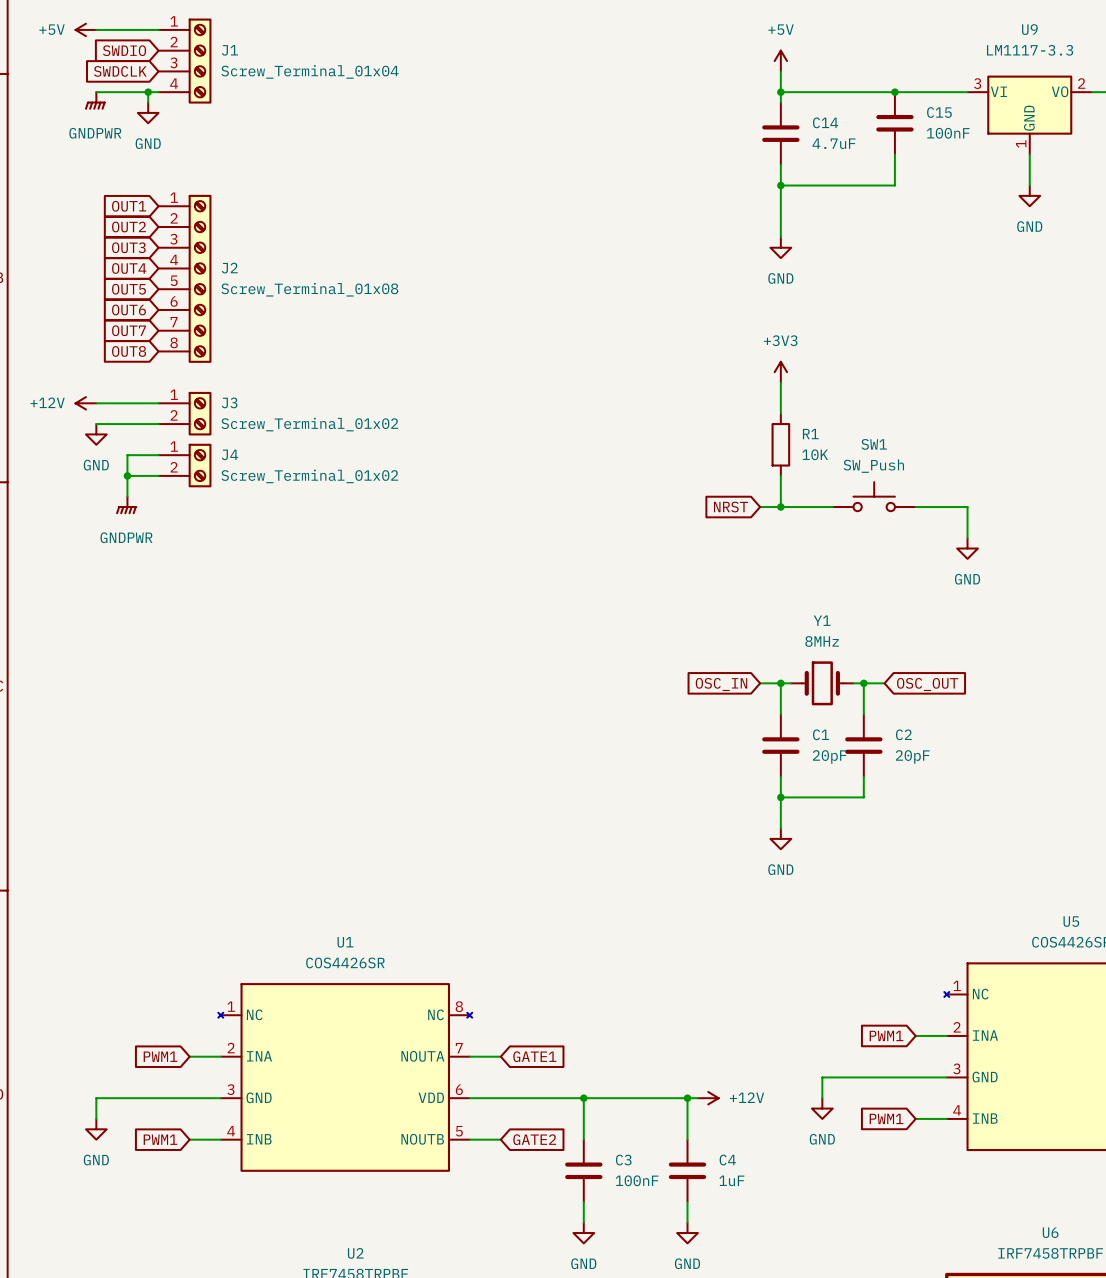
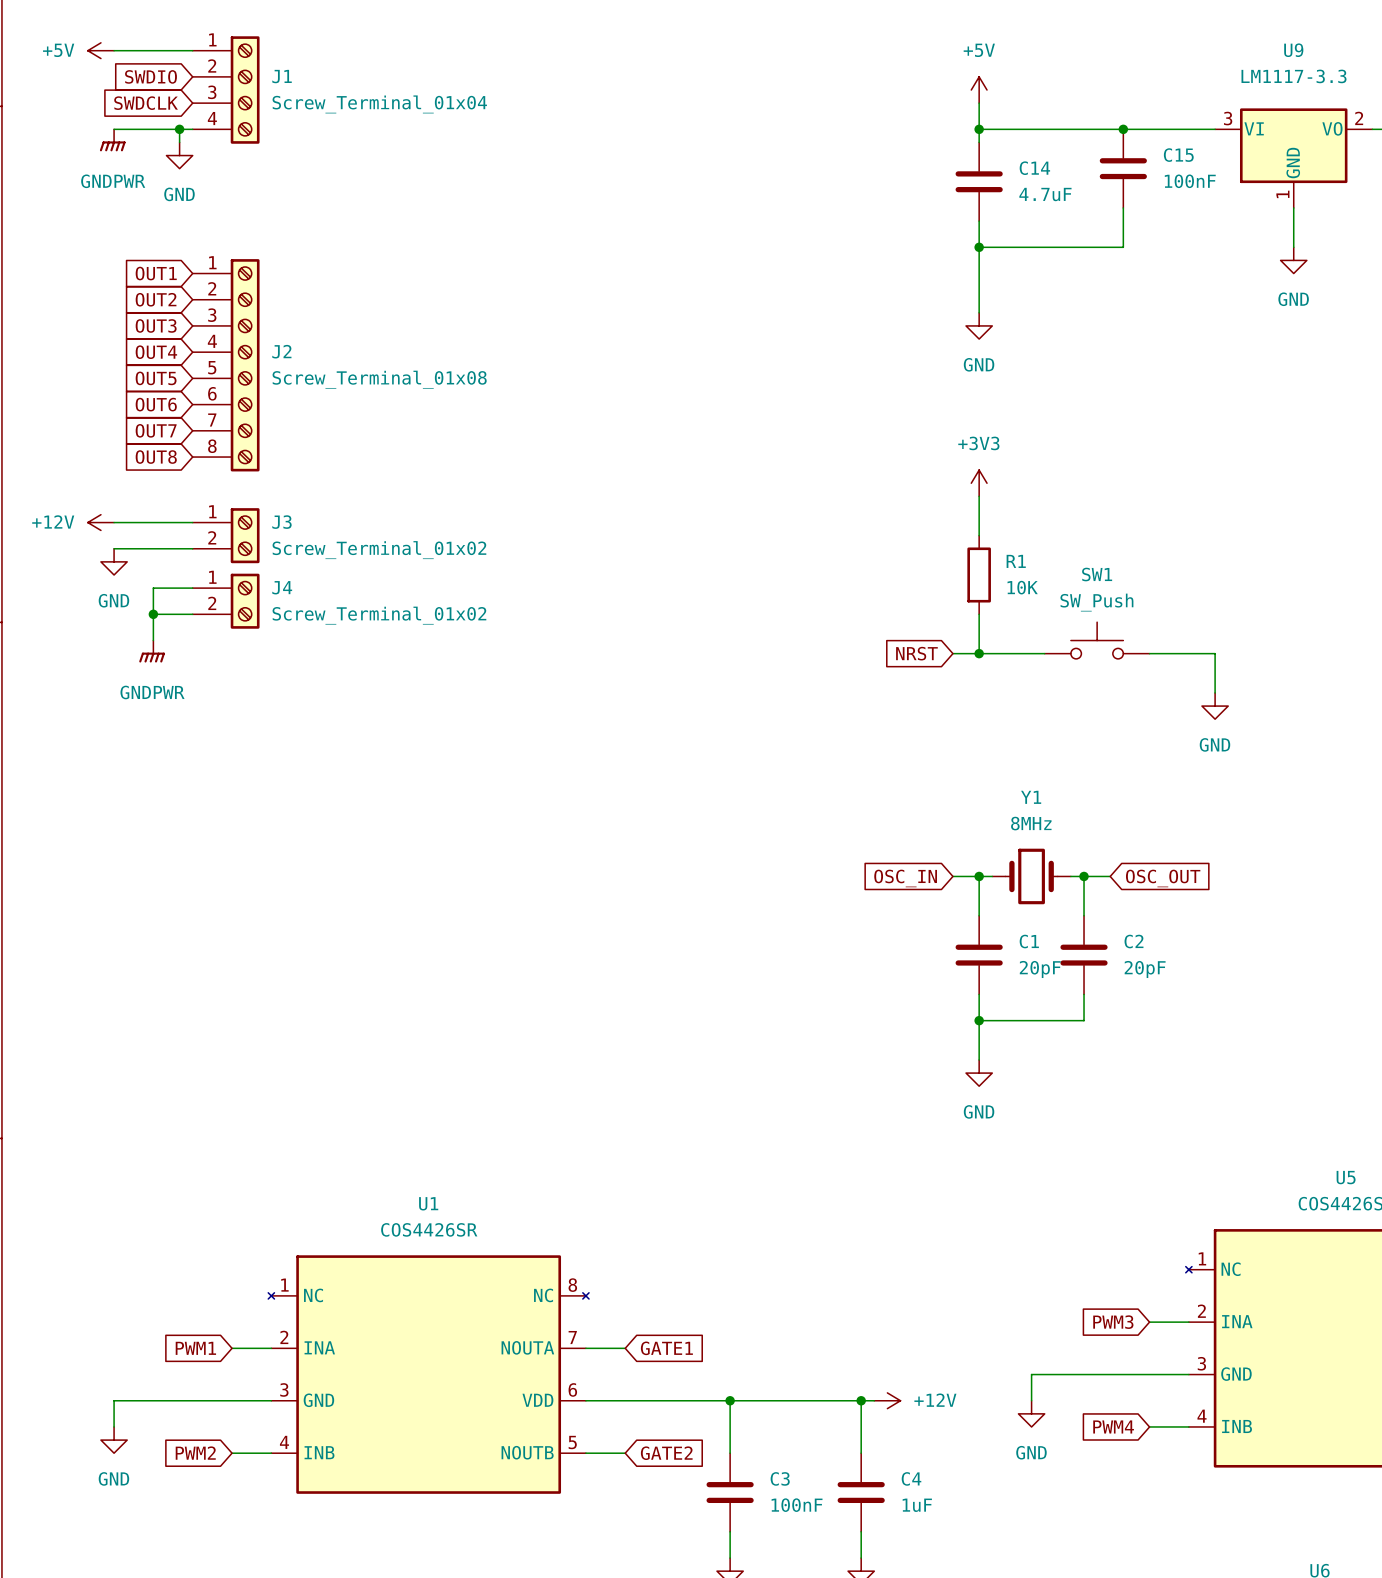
global label: PWM1 (886, 1035) -> PWM3 (1113, 1322)
global label: PWM1 (886, 1118) -> PWM4 (1113, 1426)
global label: PWM1 (160, 1139) -> PWM2 (195, 1453)

